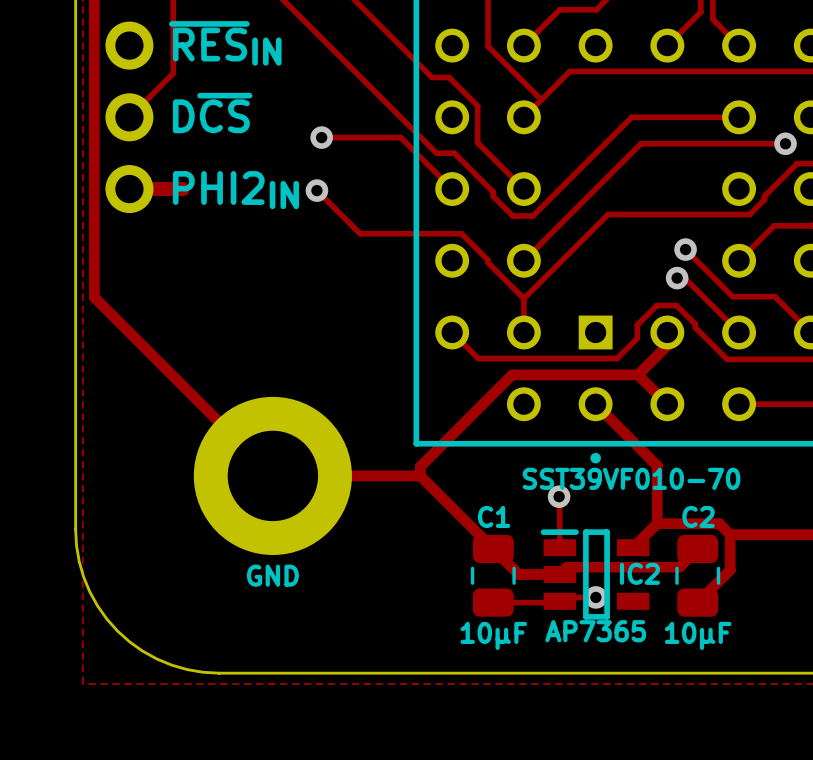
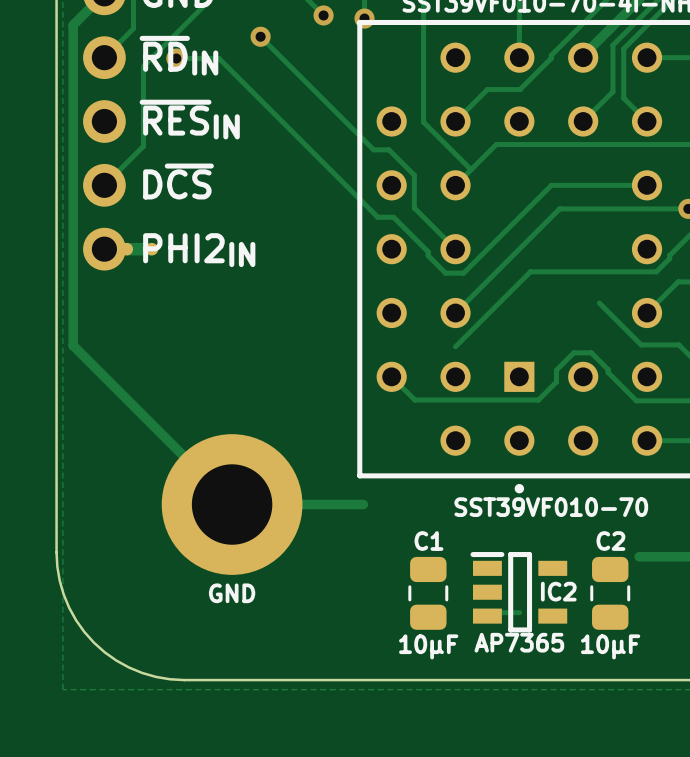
track: (321, 137) (400, 137) (452, 189) -> none
via: (321, 137) -> none
track: (316, 190) (360, 233) (461, 233) (523, 298) (523, 332) -> none
via: (316, 190) -> none
via: (685, 249) -> none
track: (677, 278) (684, 278) (739, 332) -> none
via: (677, 278) -> none
track: (667, 332) (667, 345) (638, 374) -> none
track: (638, 374) (667, 404) -> none
track: (638, 374) (512, 374) (420, 466) (420, 475) (518, 574) (559, 574) (567, 567) (679, 567) (697, 548) -> none
track: (595, 404) (657, 465) (657, 523) -> none
track: (559, 496) (559, 547) -> none
via: (559, 496) -> none
track: (657, 523) (719, 523) (730, 534) (730, 570) (697, 602) -> none
track: (657, 523) (633, 547) -> none
via: (595, 597) -> none
track: (493, 602) (558, 602) -> none

